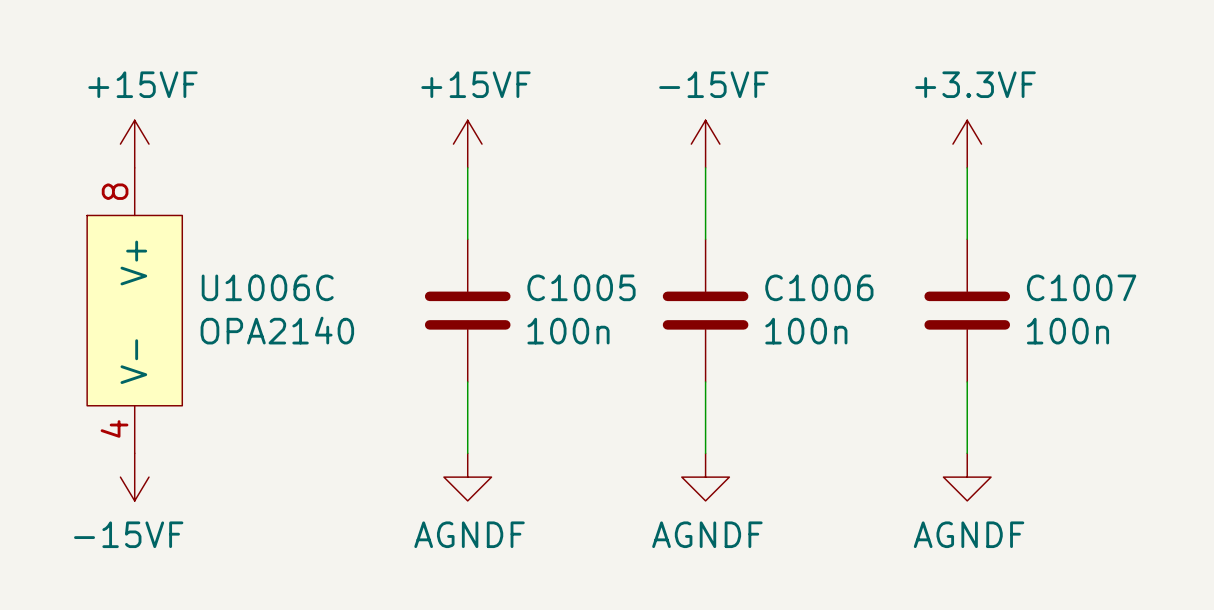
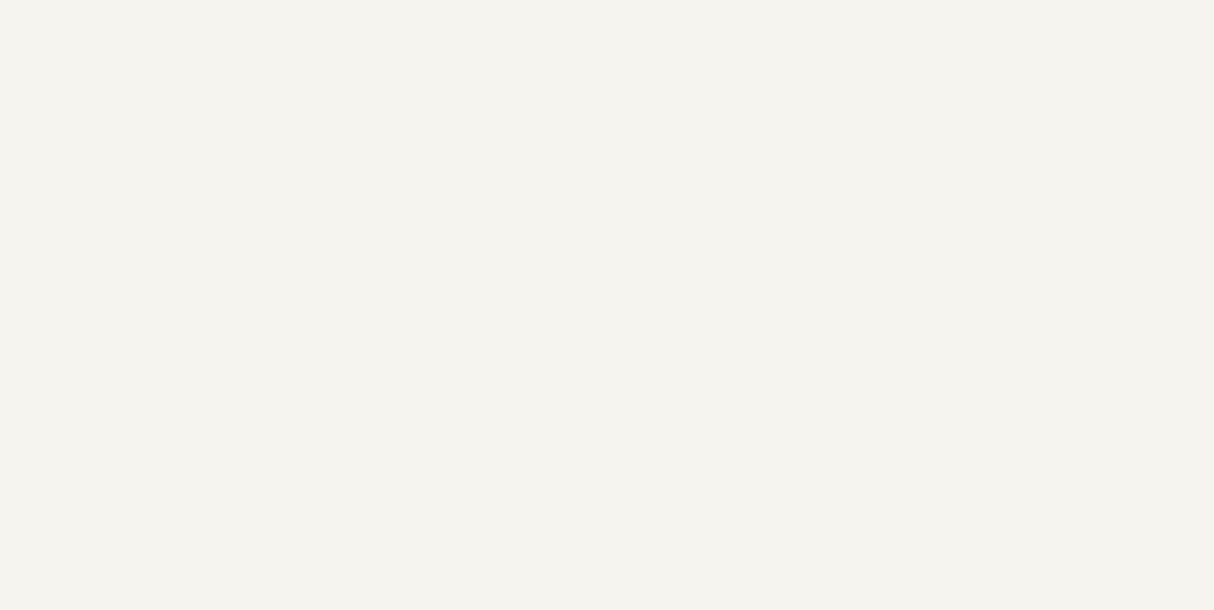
power symbol: +15VF (134, 144) -> none
power symbol: +15VF (467, 144) -> none
power symbol: -15VF (705, 144) -> none
power symbol: +3.3VF (967, 144) -> none
wire: (467, 167) (467, 239) -> none
wire: (705, 167) (705, 239) -> none
wire: (967, 167) (967, 239) -> none
U1006C: OPA2140 (134, 310) -> none
C1005: 100n (467, 310) -> none
C1006: 100n (705, 310) -> none
C1007: 100n (967, 310) -> none
wire: (467, 381) (467, 453) -> none
wire: (705, 381) (705, 453) -> none
wire: (967, 381) (967, 453) -> none
power symbol: -15VF (134, 477) -> none
power symbol: AGNDF (467, 477) -> none
power symbol: AGNDF (705, 477) -> none
power symbol: AGNDF (967, 477) -> none

